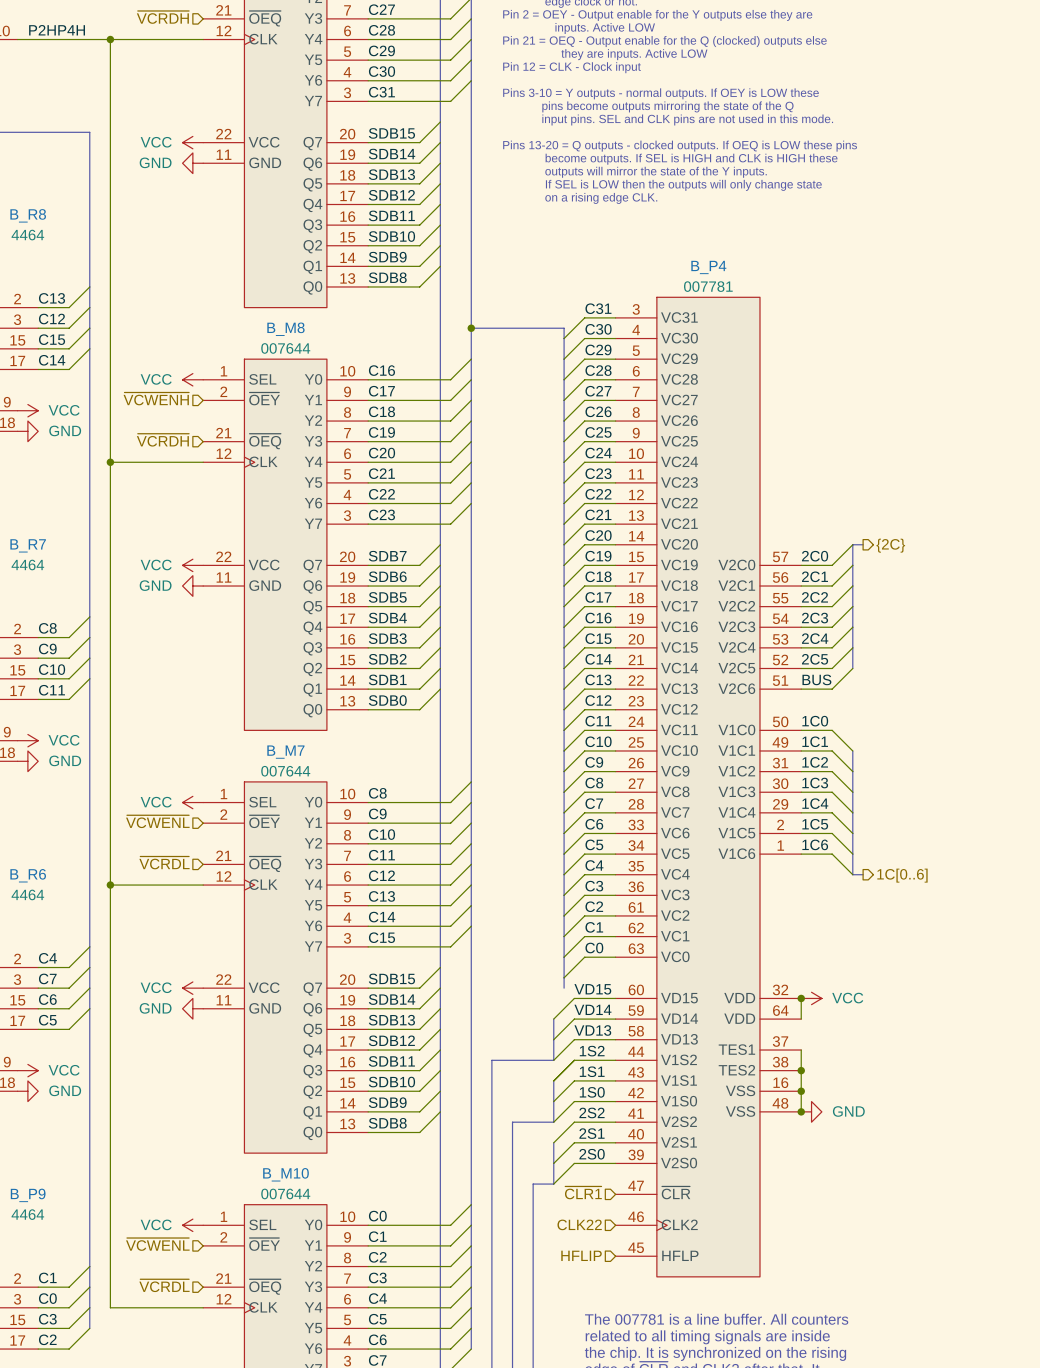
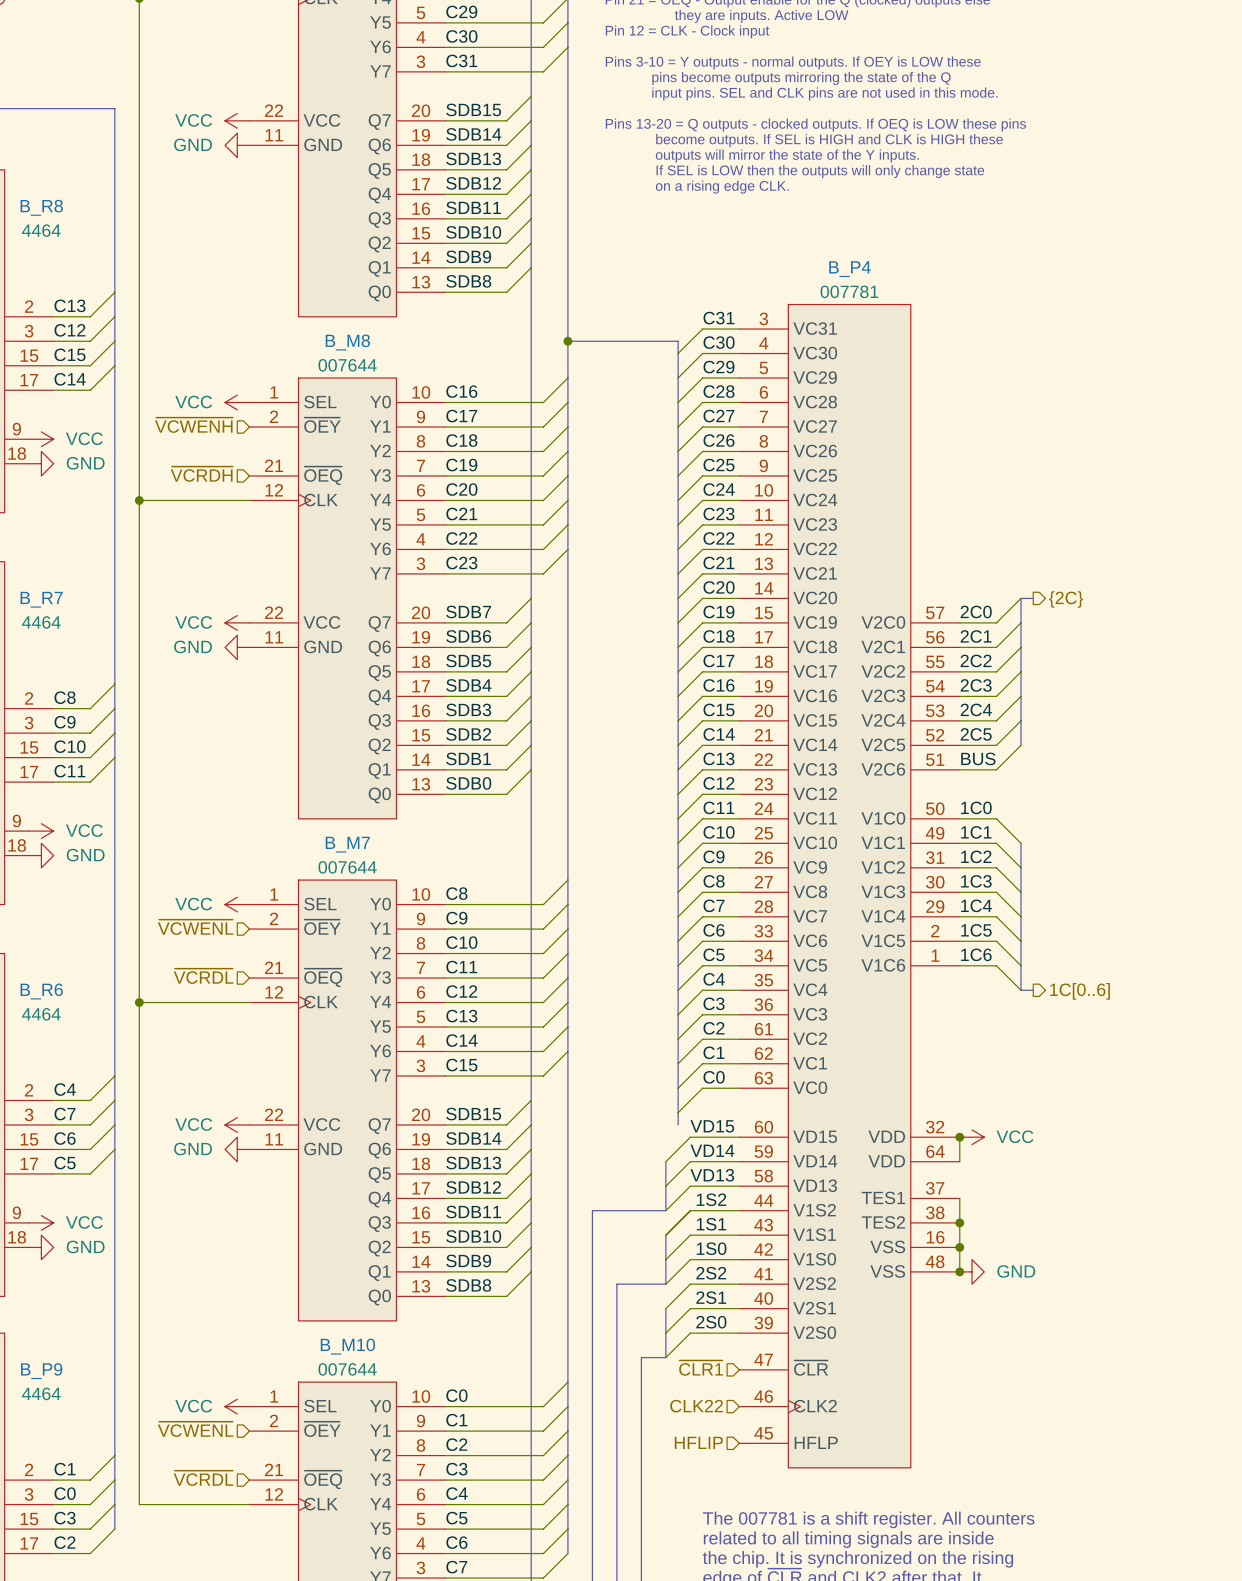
text: The 007781 is a line buffer. All counters (716, 1319) -> The 007781 is a shift register. All counters (868, 1519)

